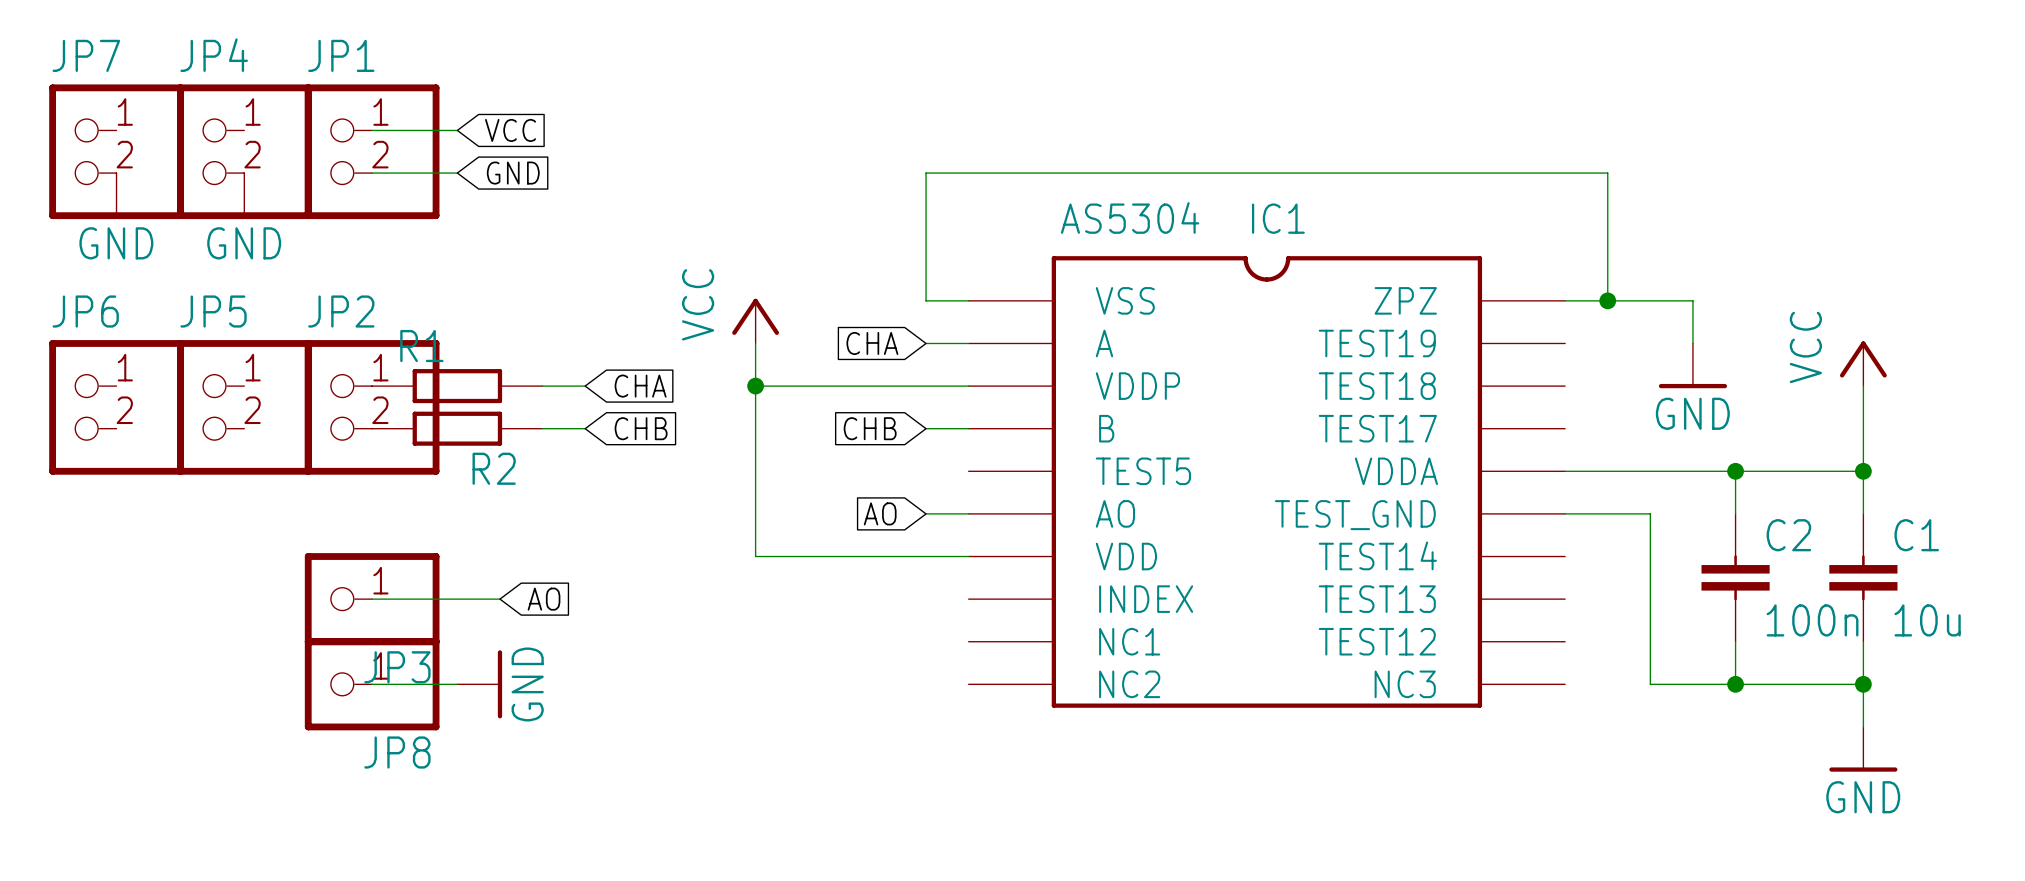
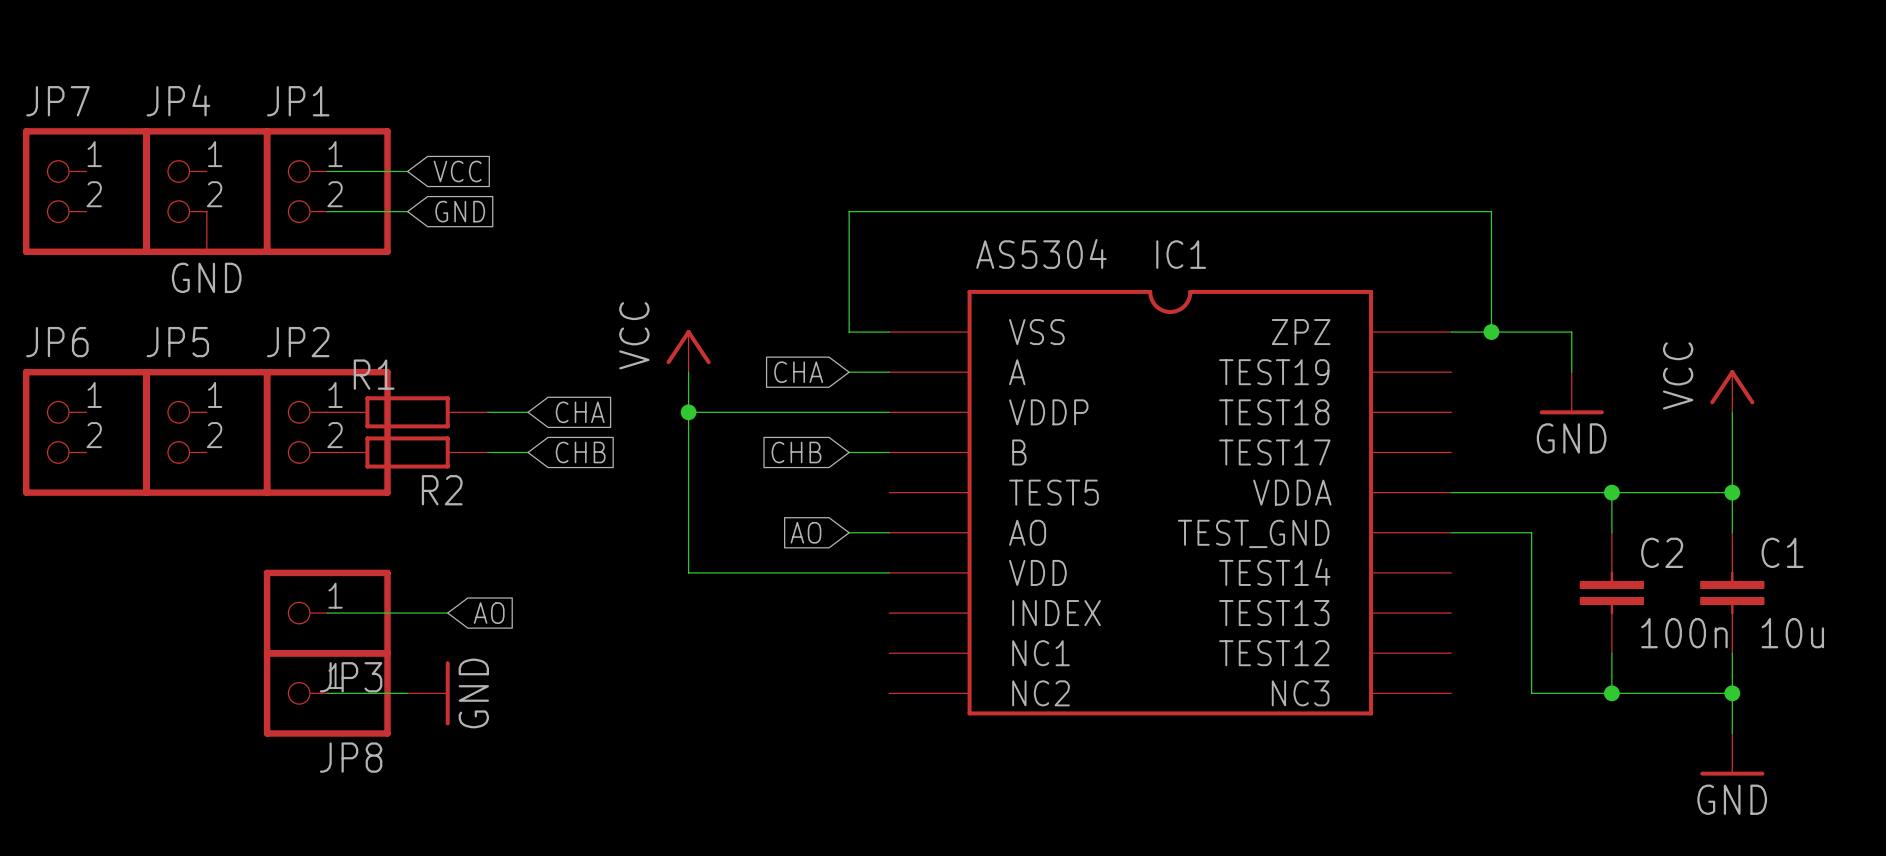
power symbol: GND (116, 195) -> none

